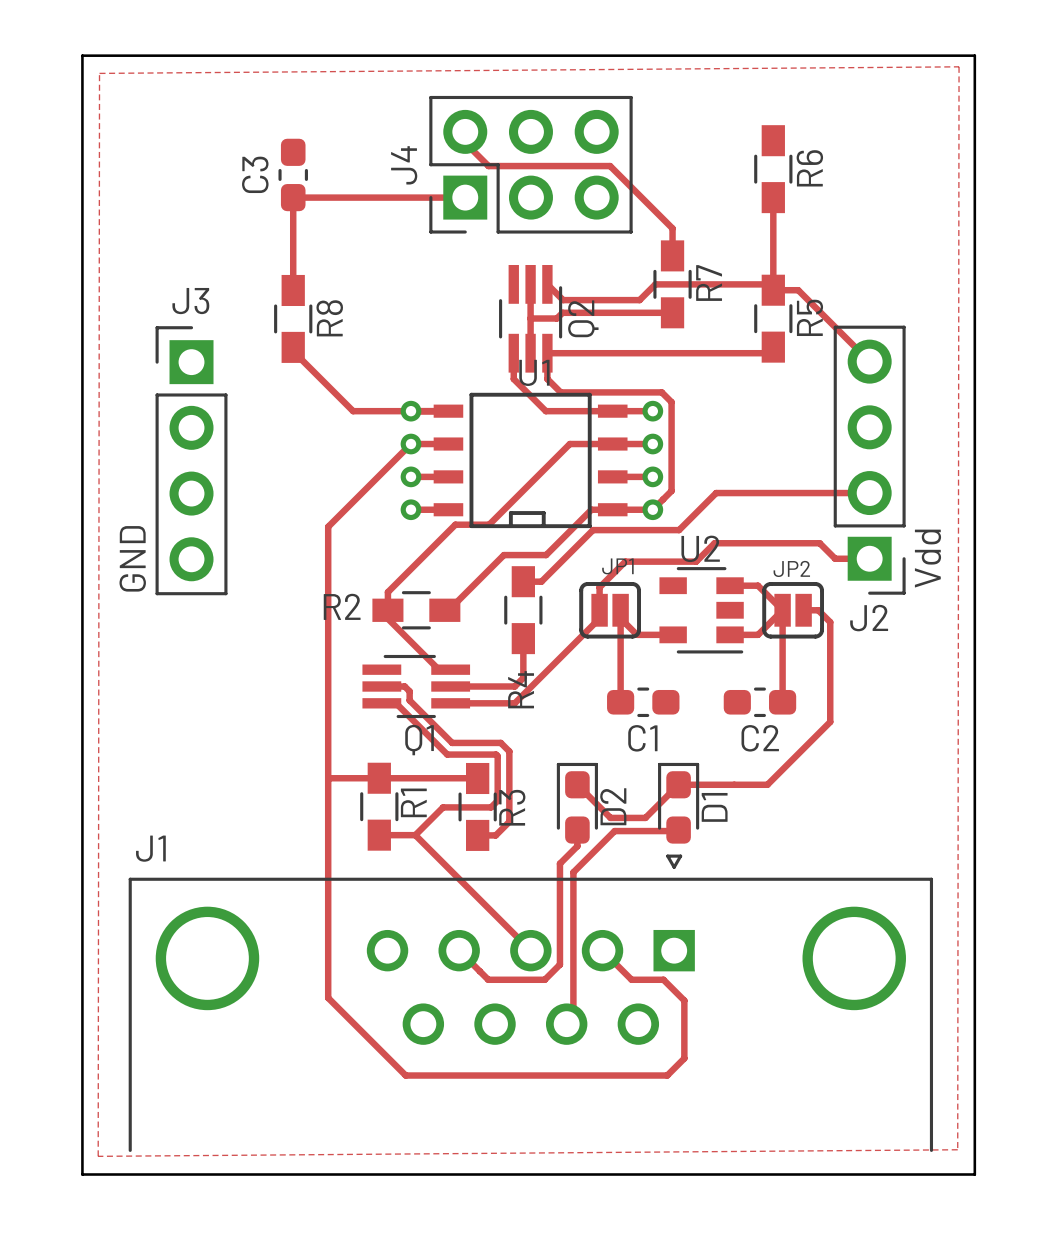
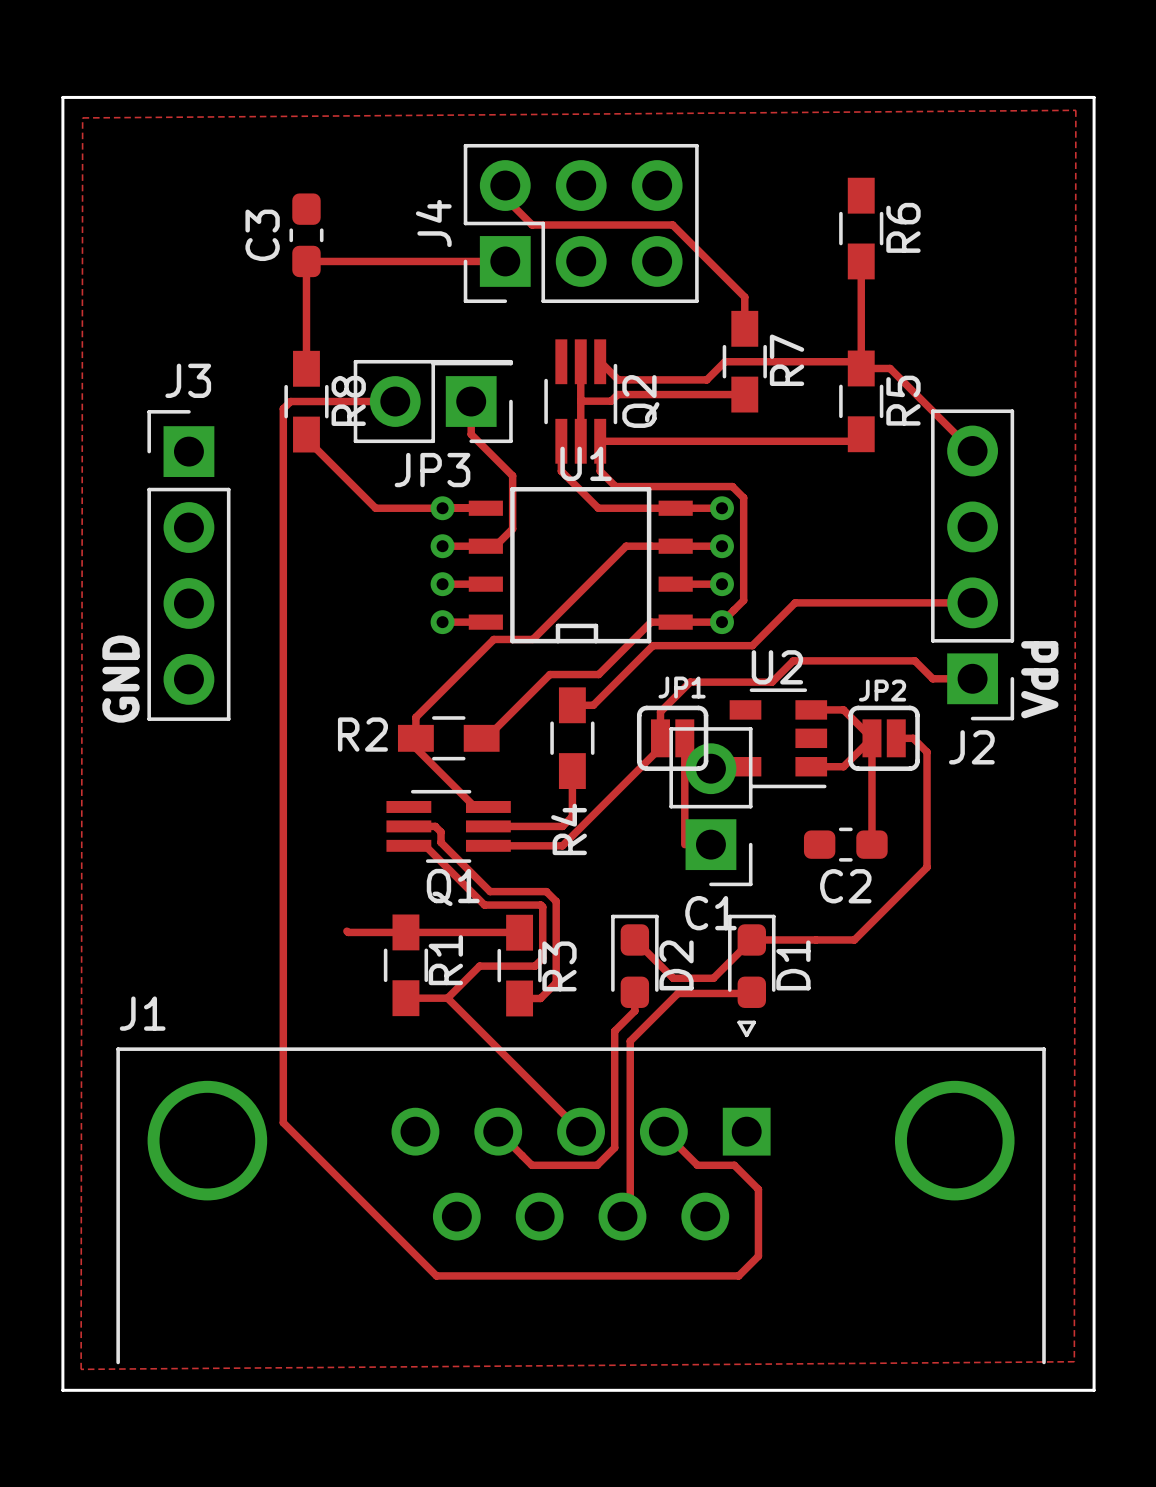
JP3: none -> (433, 401)
track: none -> (471, 401) (471, 434) (512, 475) (512, 528) (495, 546) (485, 546)
track: (410, 444) (328, 526) (328, 997) -> (395, 401) (290, 401) (283, 408) (283, 1122) (346, 1186)
C1 footprint: [607, 687, 680, 718] -> [669, 727, 753, 887]
C1 name position: C1 (642, 738) -> C1 (710, 913)

